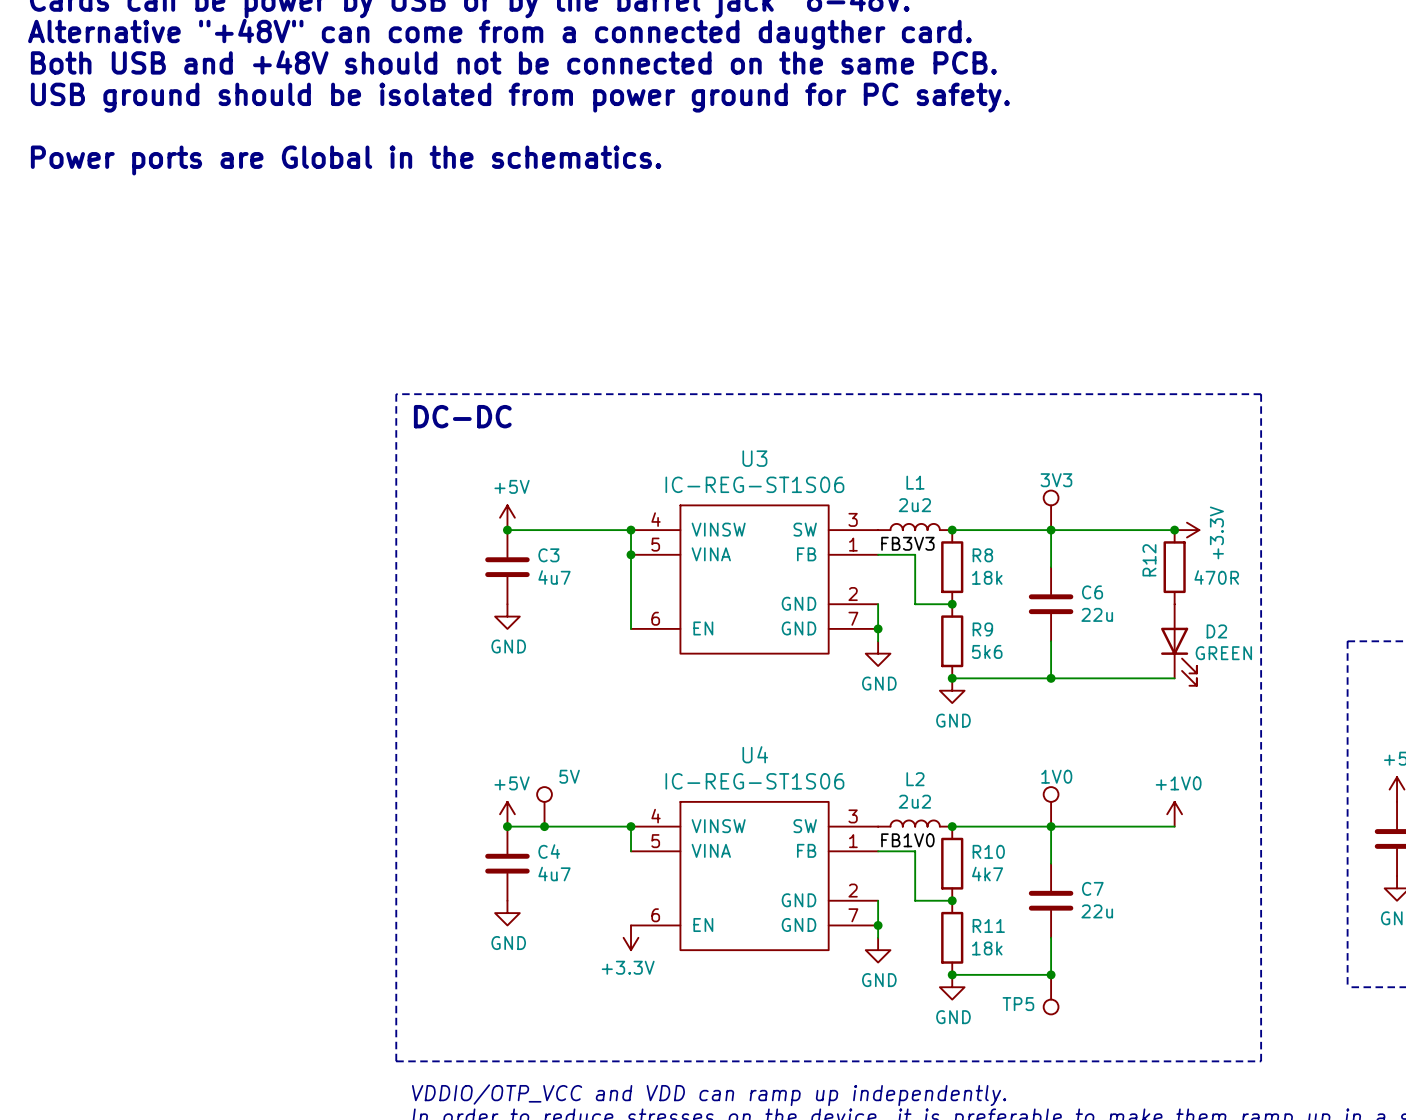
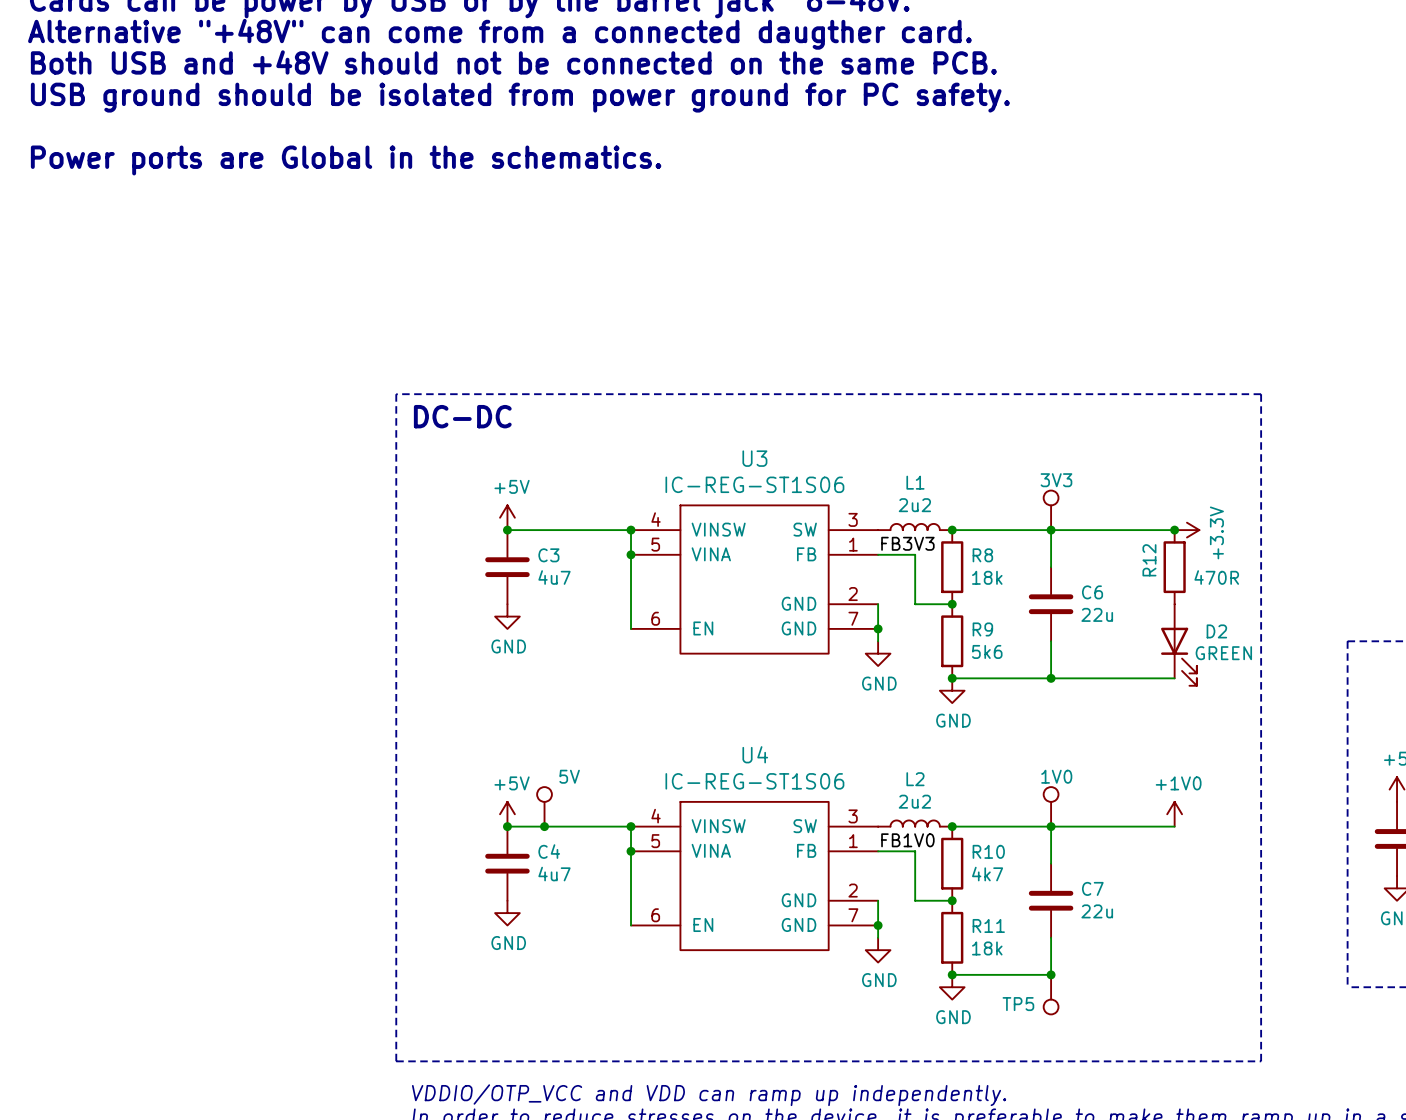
wire: none -> (631, 851) (631, 925)
junction: none -> (631, 851)
power symbol: +3.3V (631, 937) -> none

